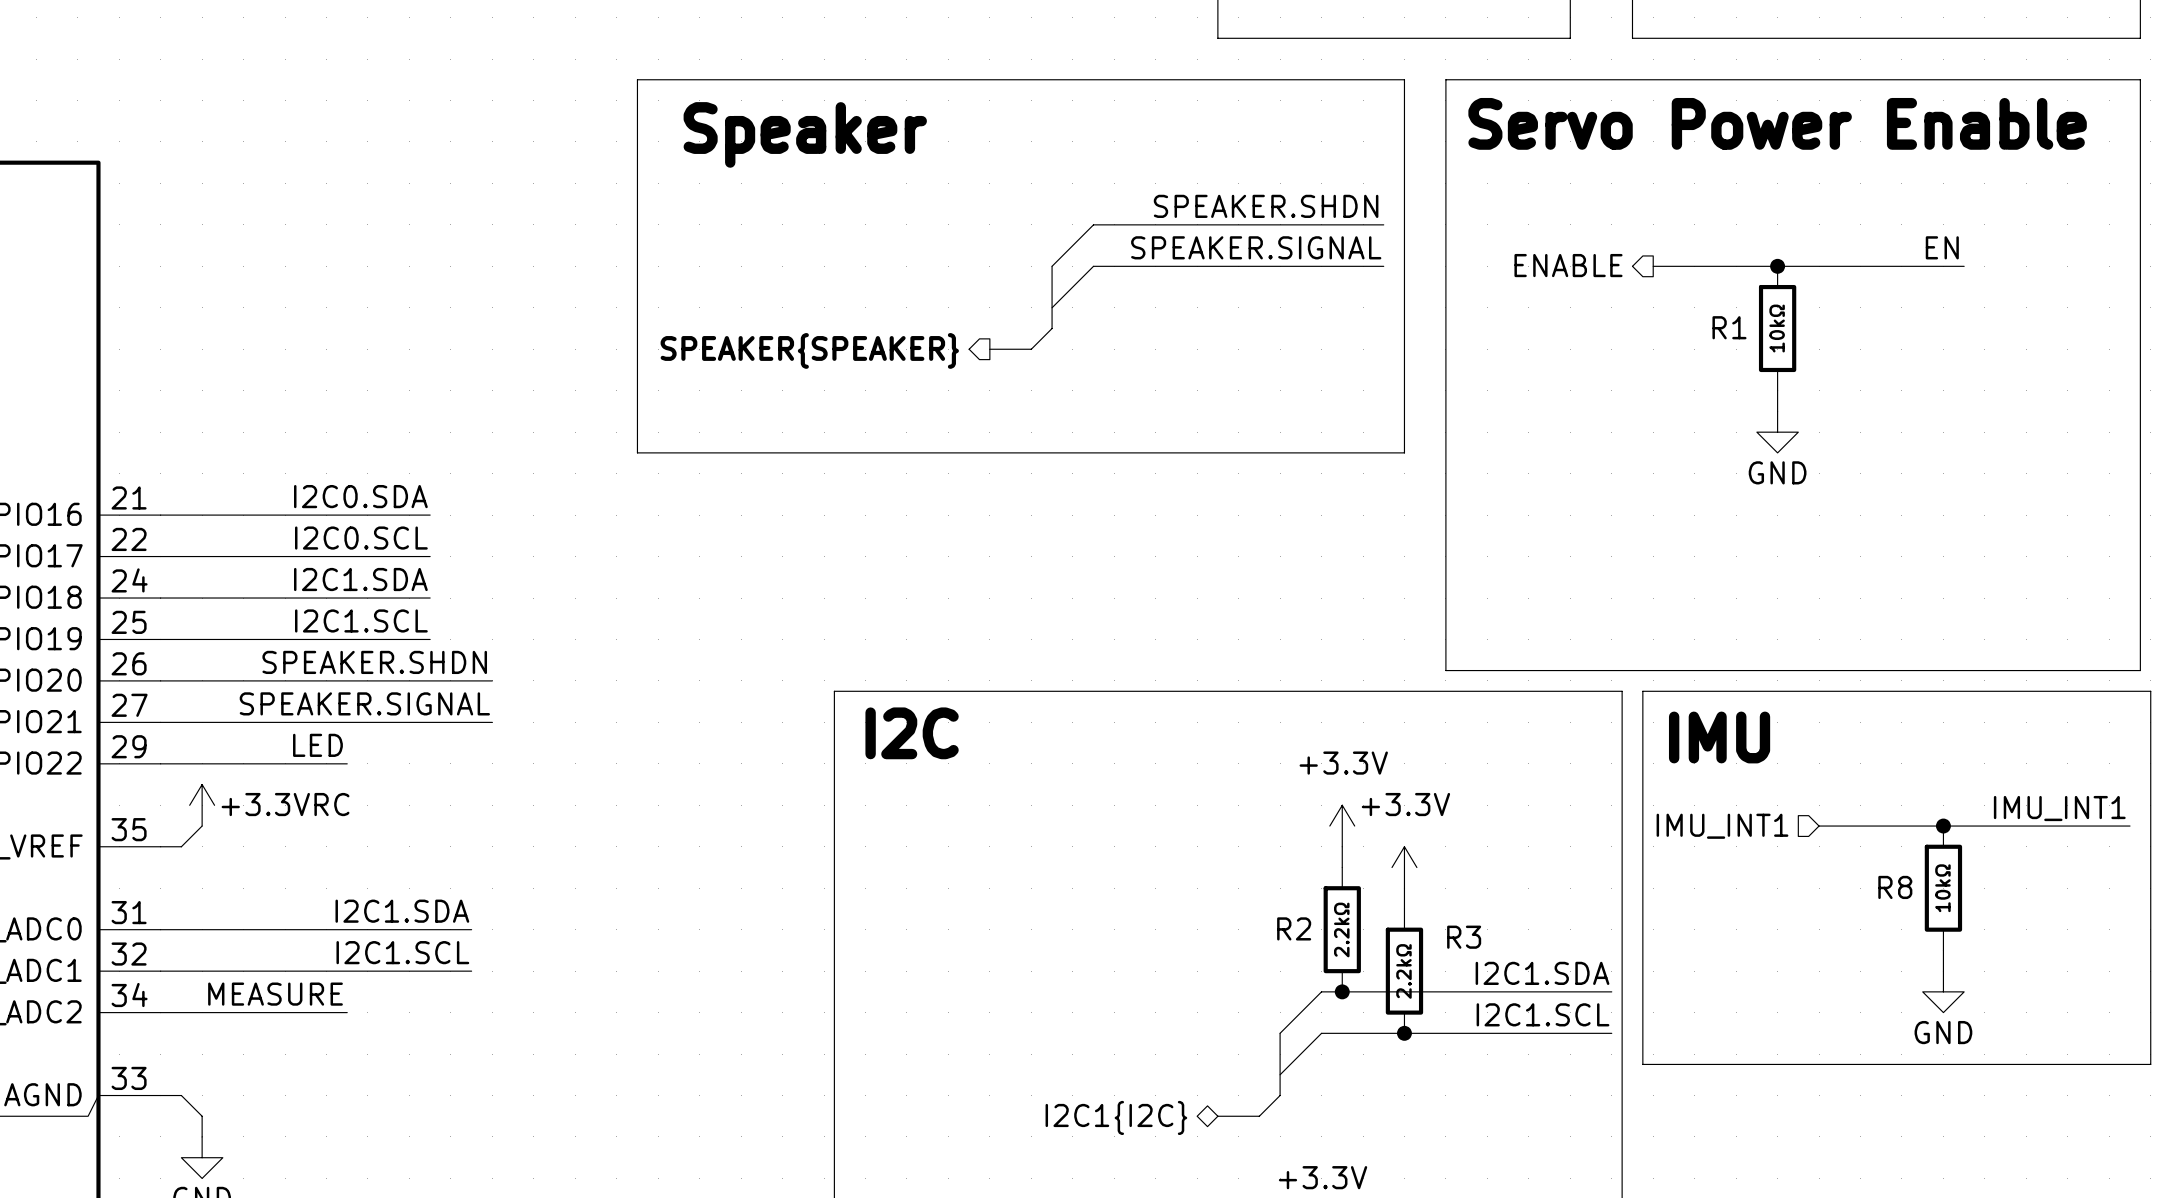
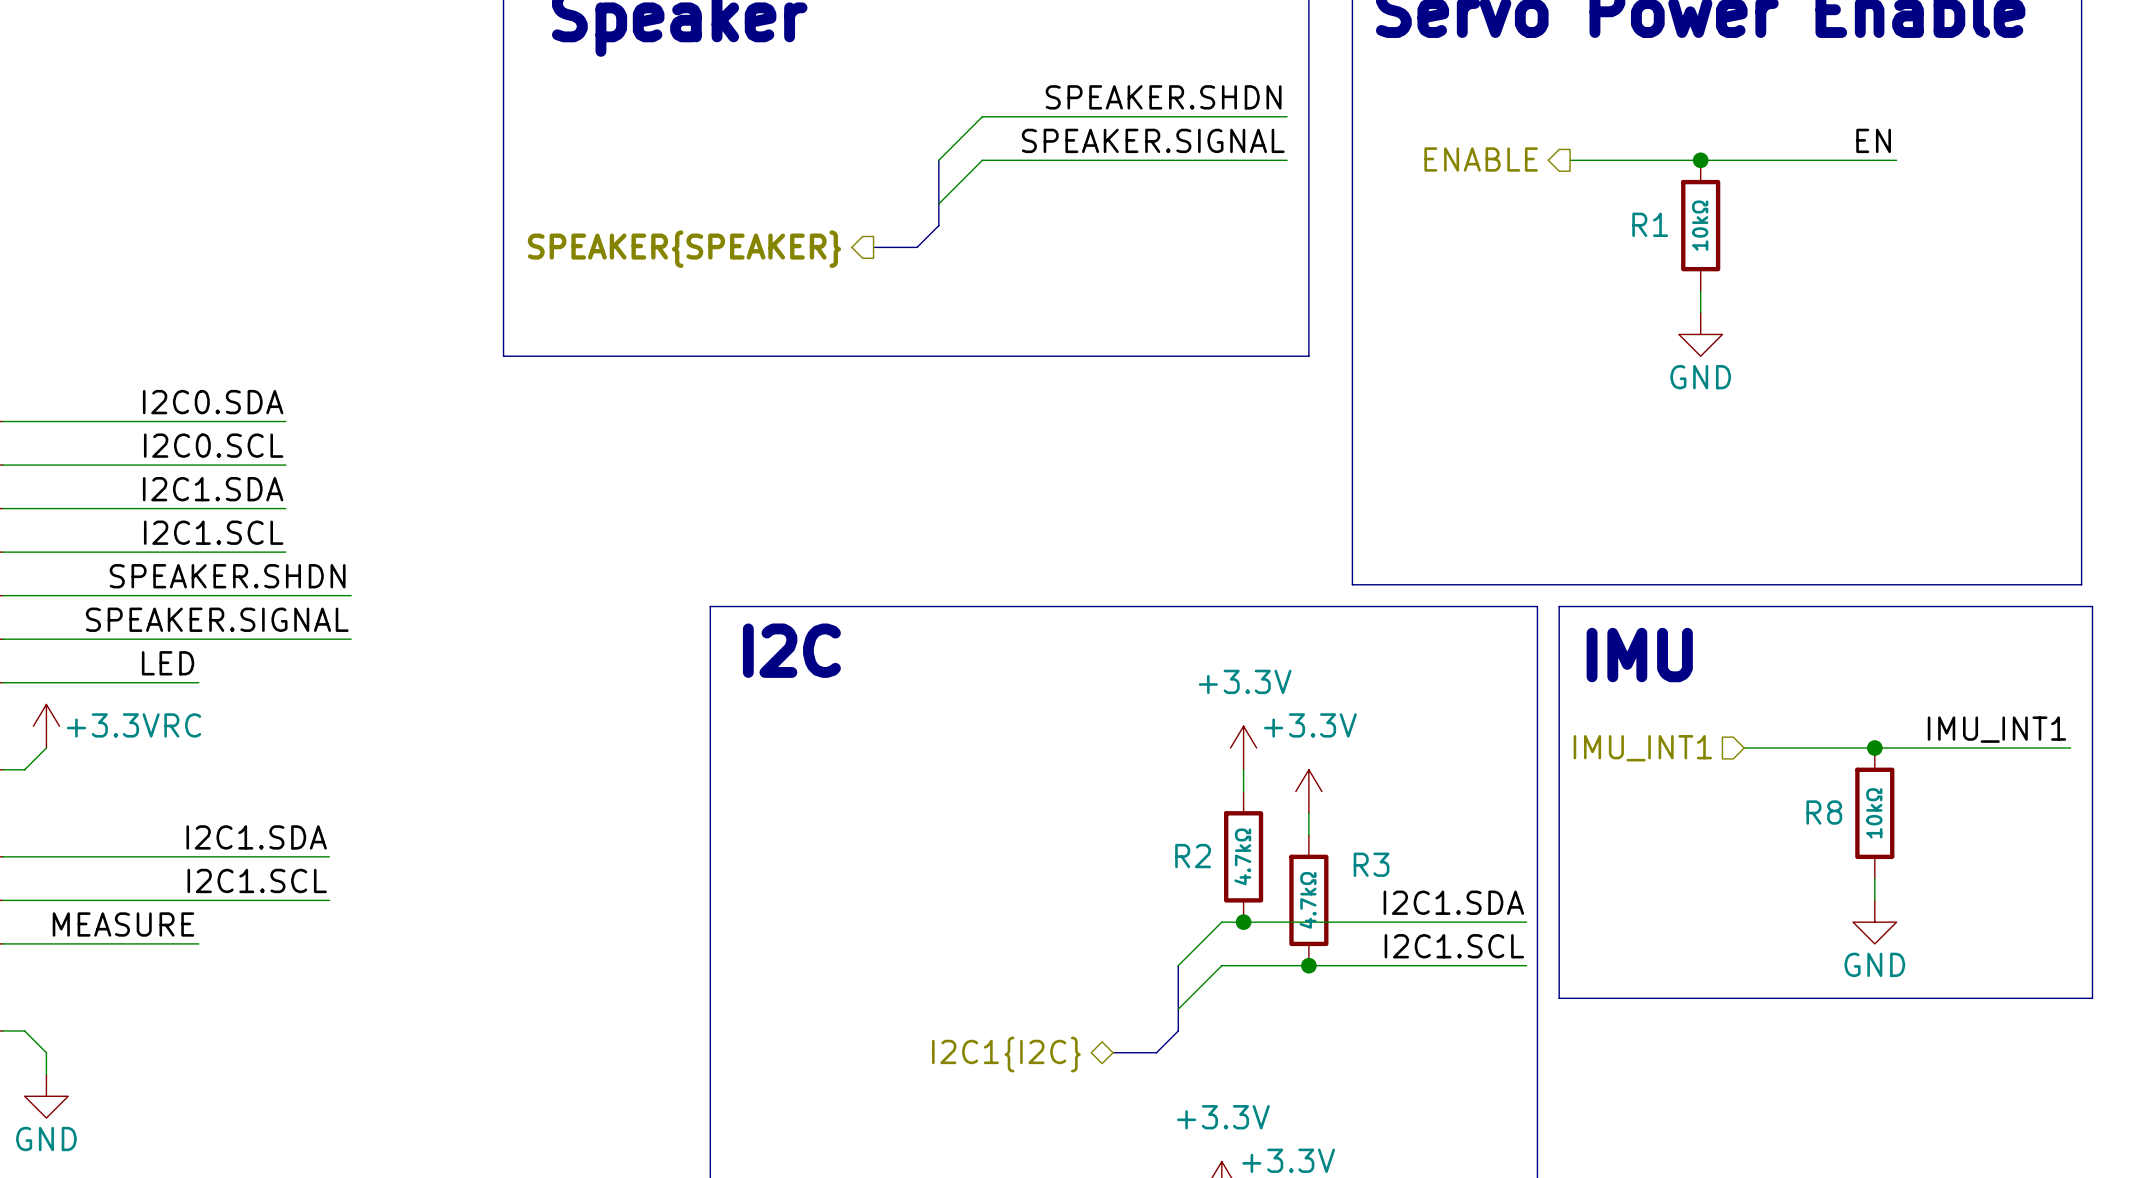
R2 value: 2.2kΩ (1341, 929) -> 4.7kΩ (1242, 856)
R3 value: 2.2kΩ (1403, 971) -> 4.7kΩ (1308, 900)

